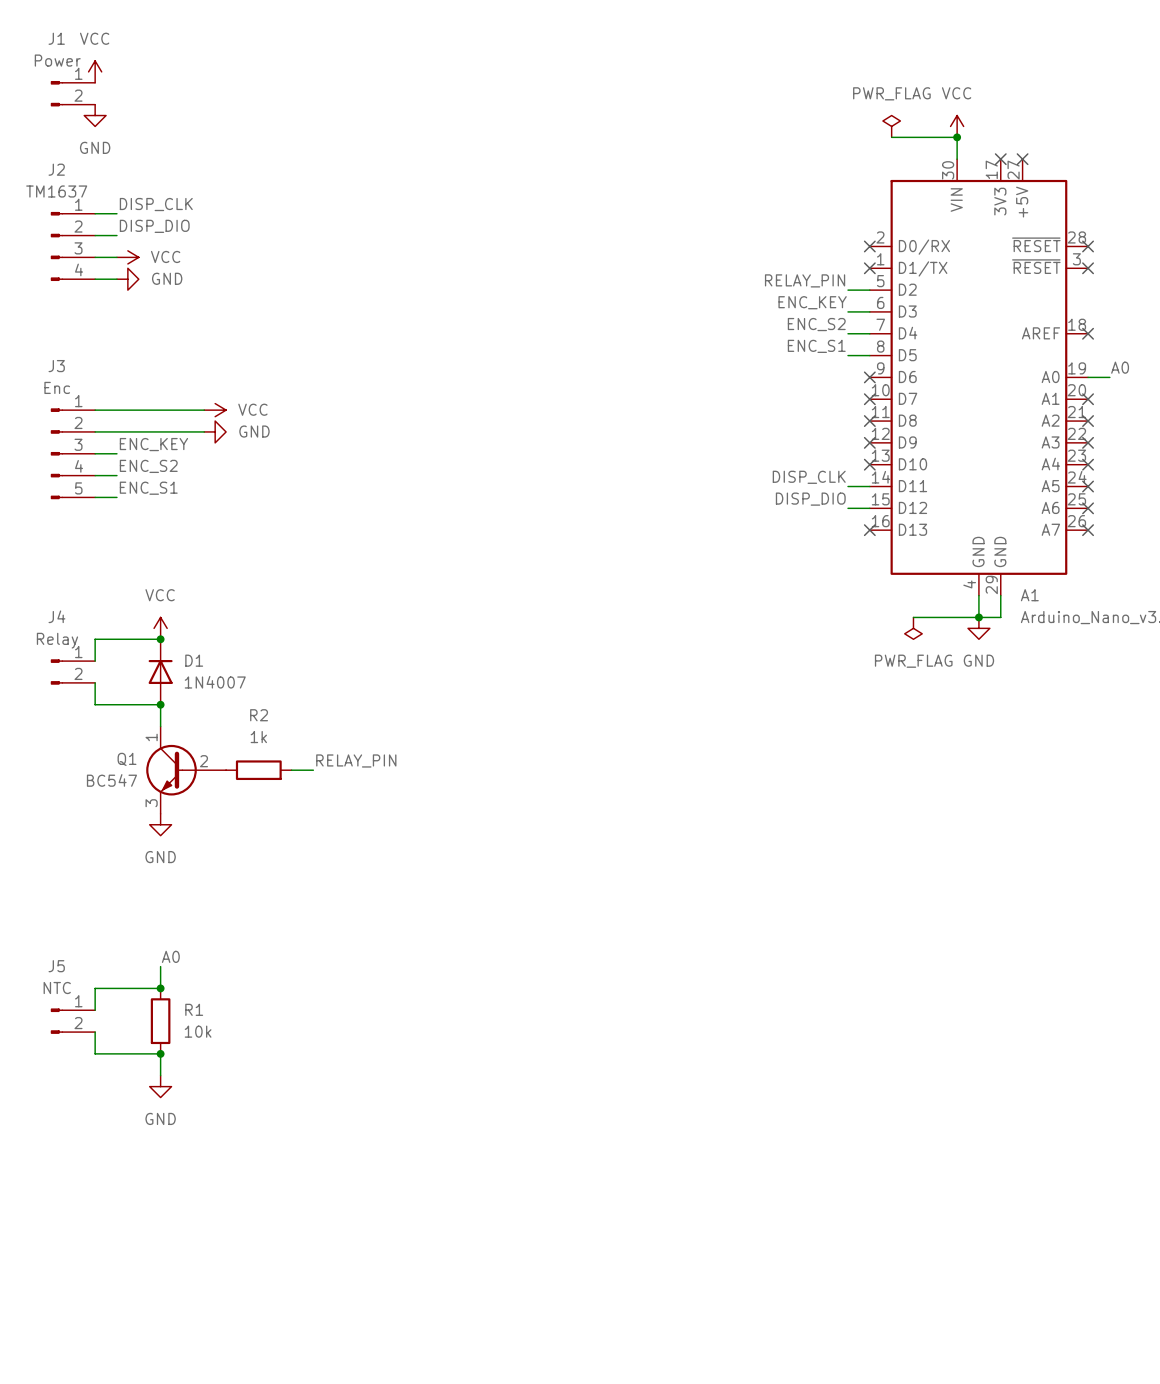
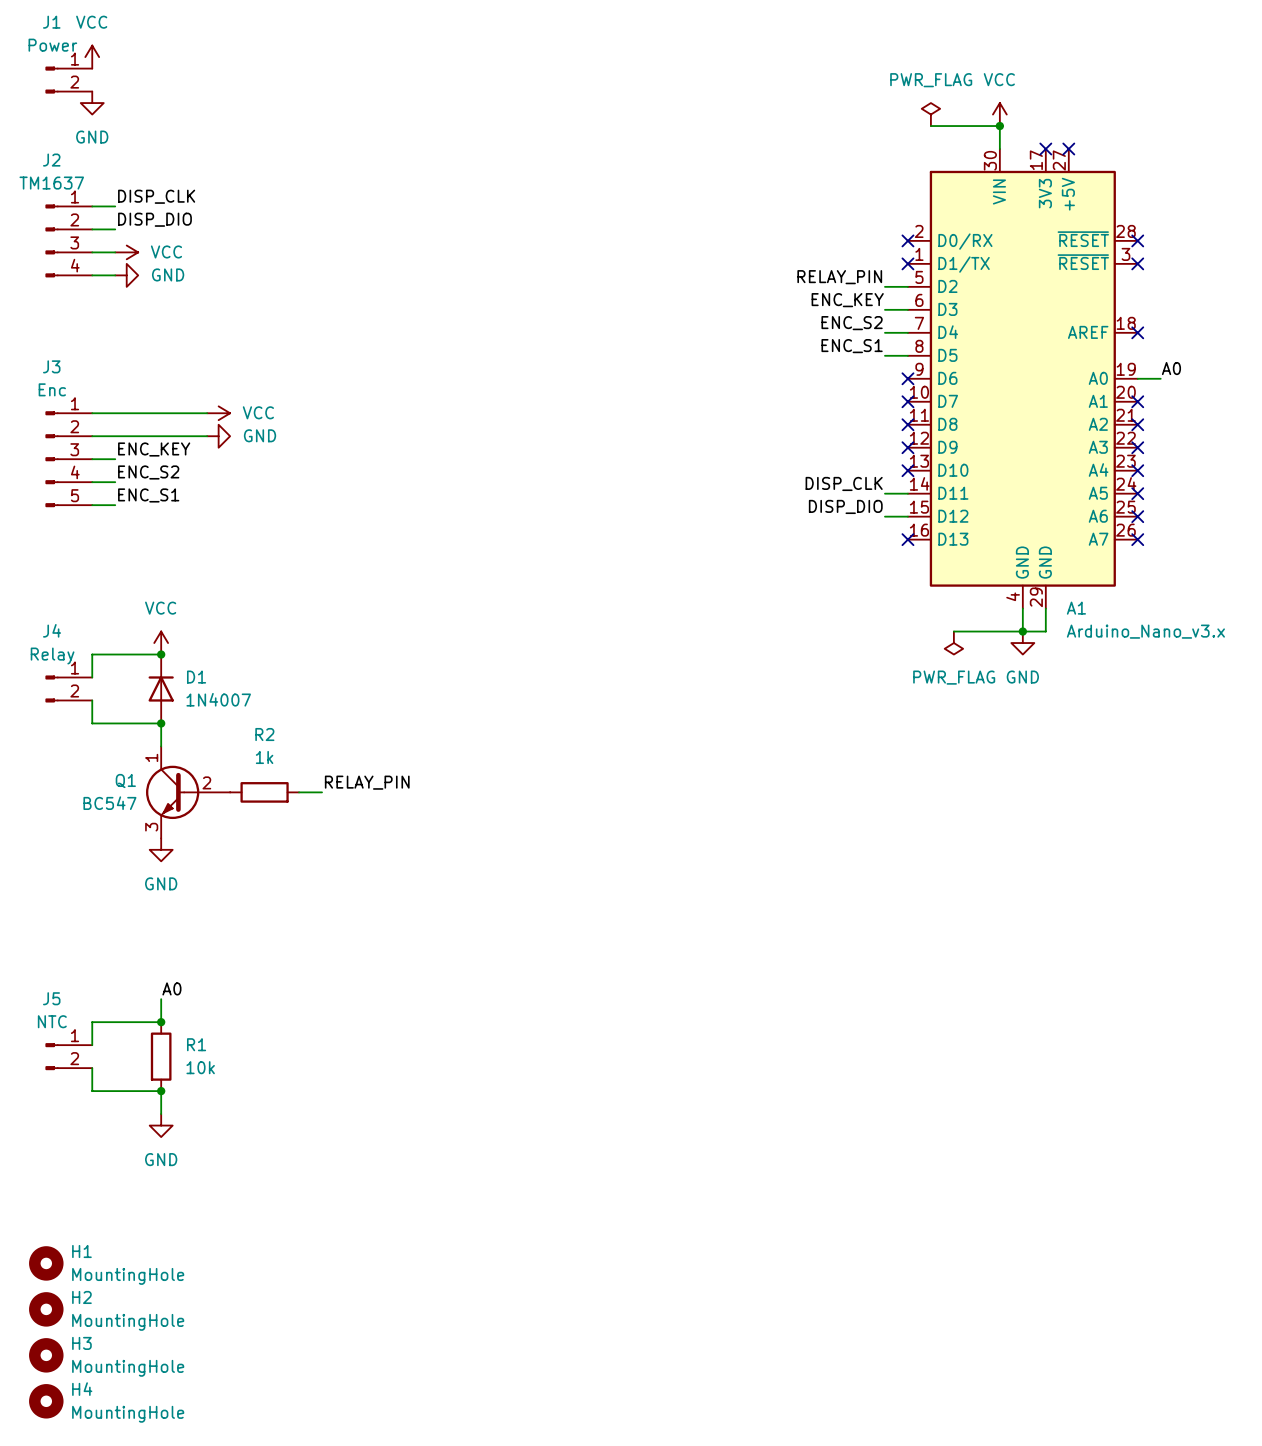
H1: none -> MountingHole (46, 1263)
H2: none -> MountingHole (46, 1309)
H3: none -> MountingHole (46, 1355)
H4: none -> MountingHole (46, 1401)

